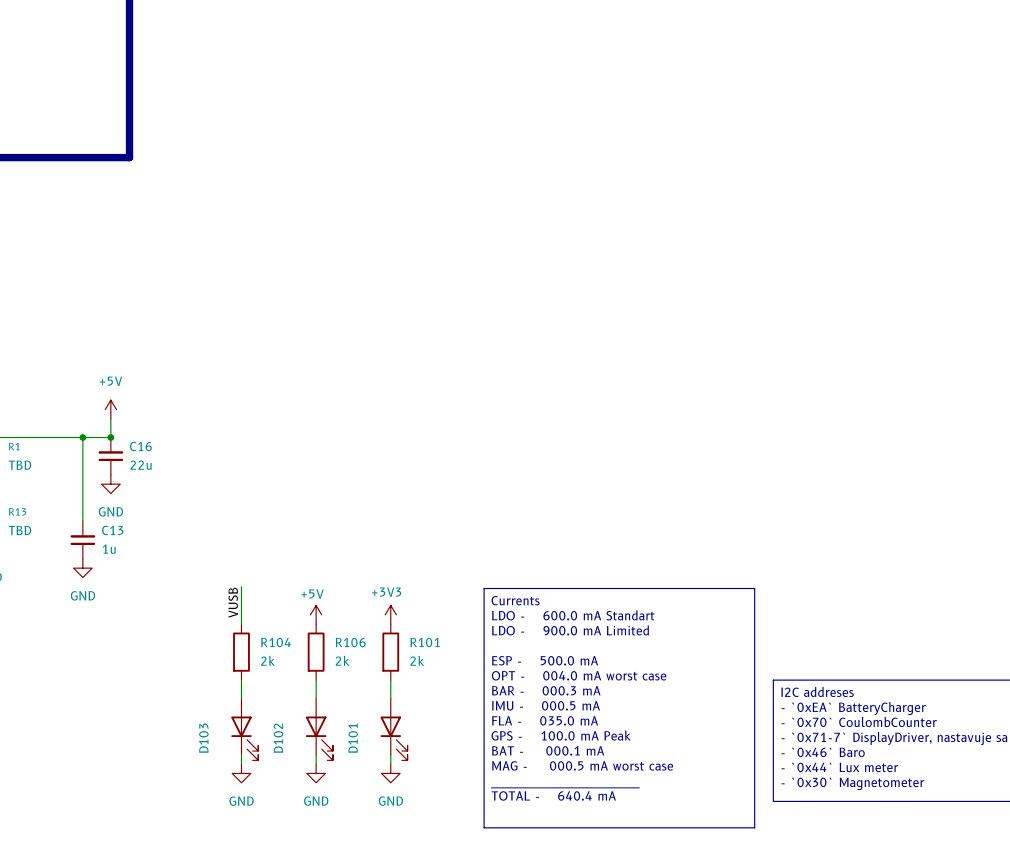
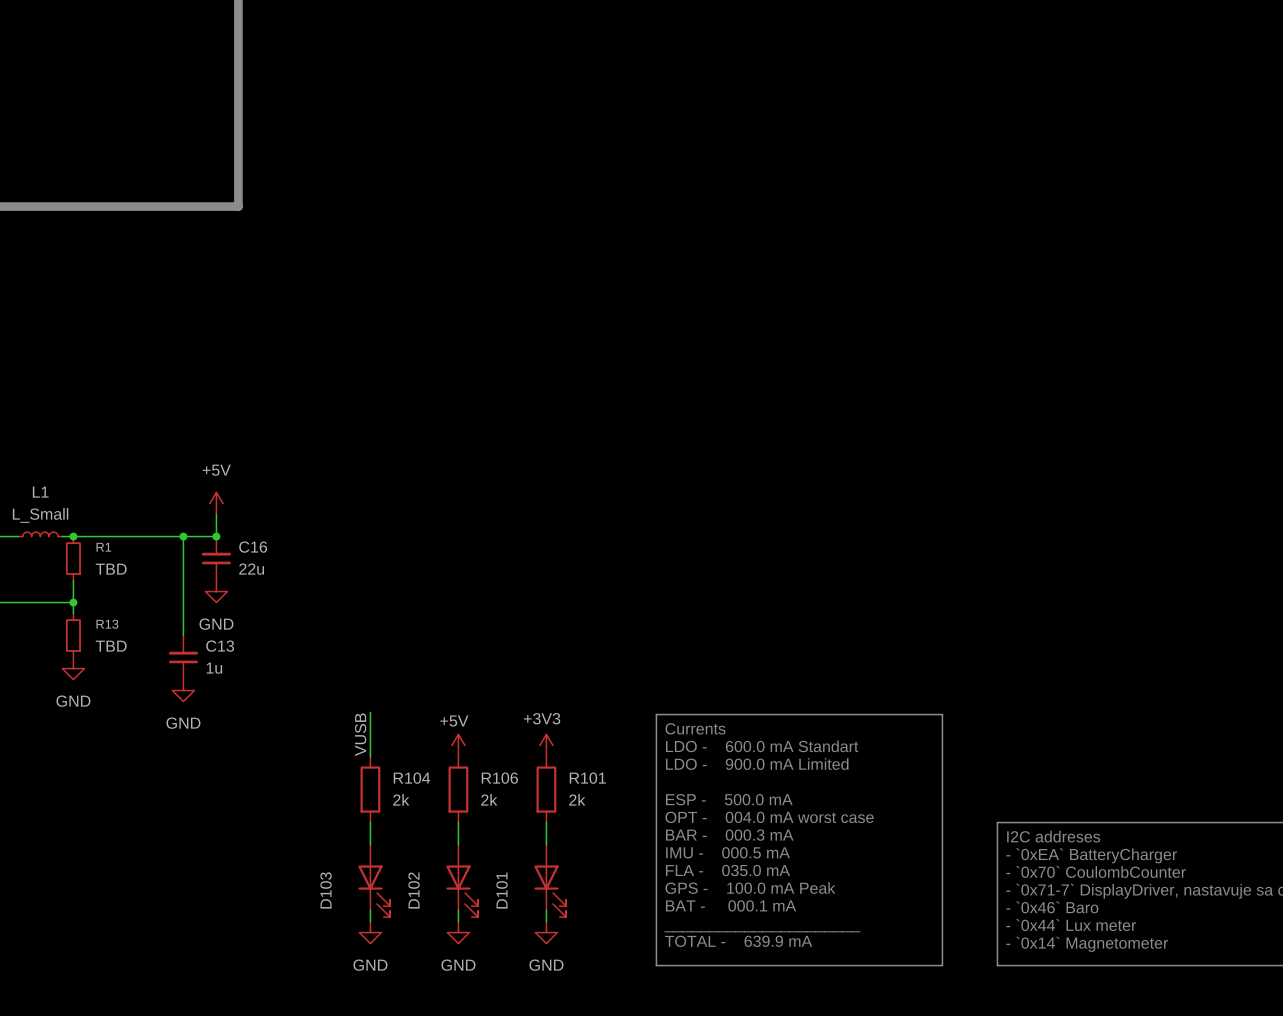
line: (726, 588) (754, 588) (754, 827) (484, 827) (484, 801) -> (942, 714) (942, 965) (656, 965)
text: MAG - 000.5 mA worst case (582, 765) -> ______________________ (762, 931)
text: - `0x30` Magnetometer (852, 783) -> - `0x14` Magnetometer (1087, 944)
text: ______________________ (565, 787) -> TOTAL - 639.9 mA (738, 941)
text: TOTAL - 640.4 mA (553, 795) -> none

